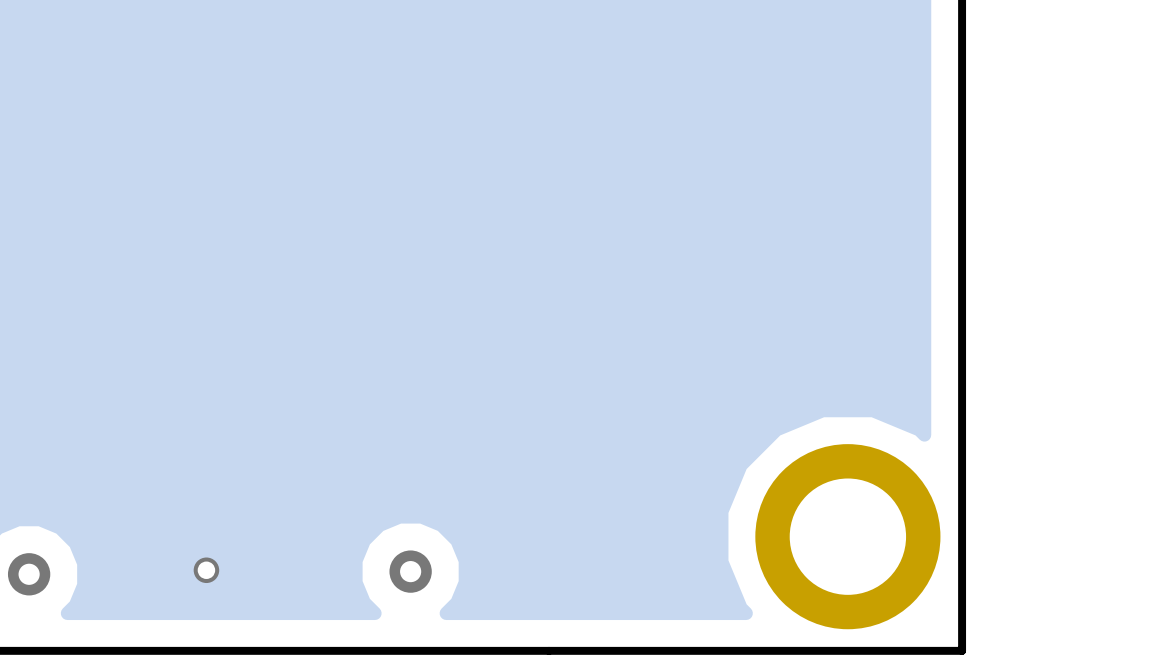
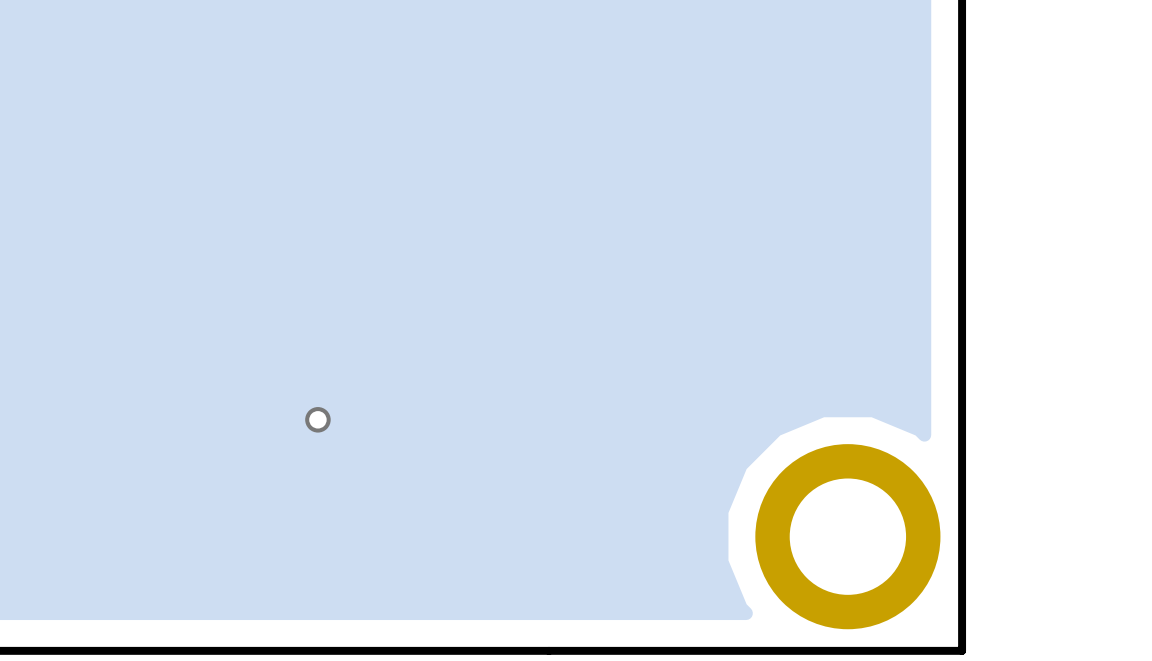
via position: (206, 570) -> (317, 419)
via: (410, 571) -> none
via: (29, 574) -> none

